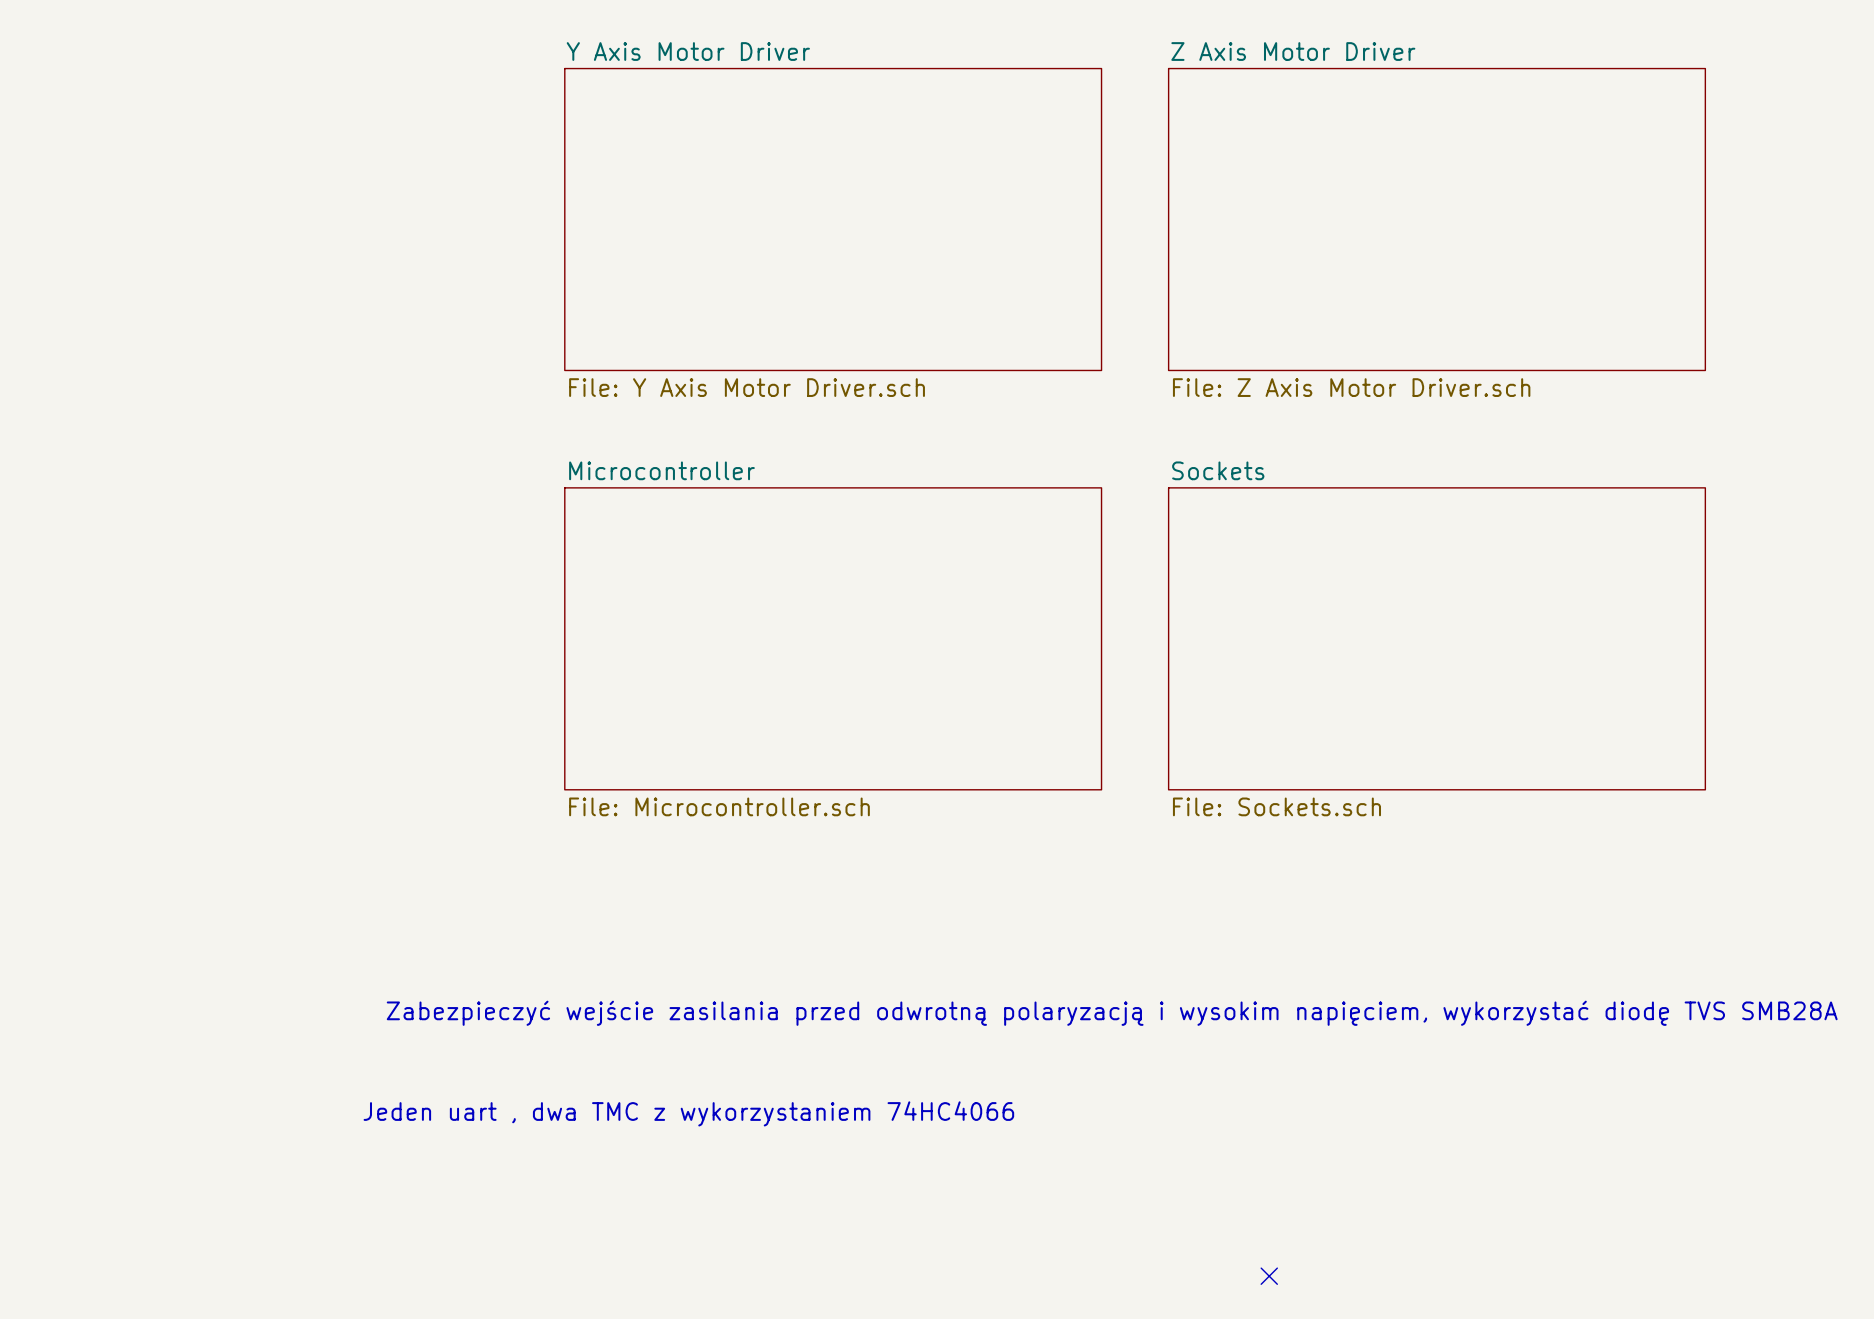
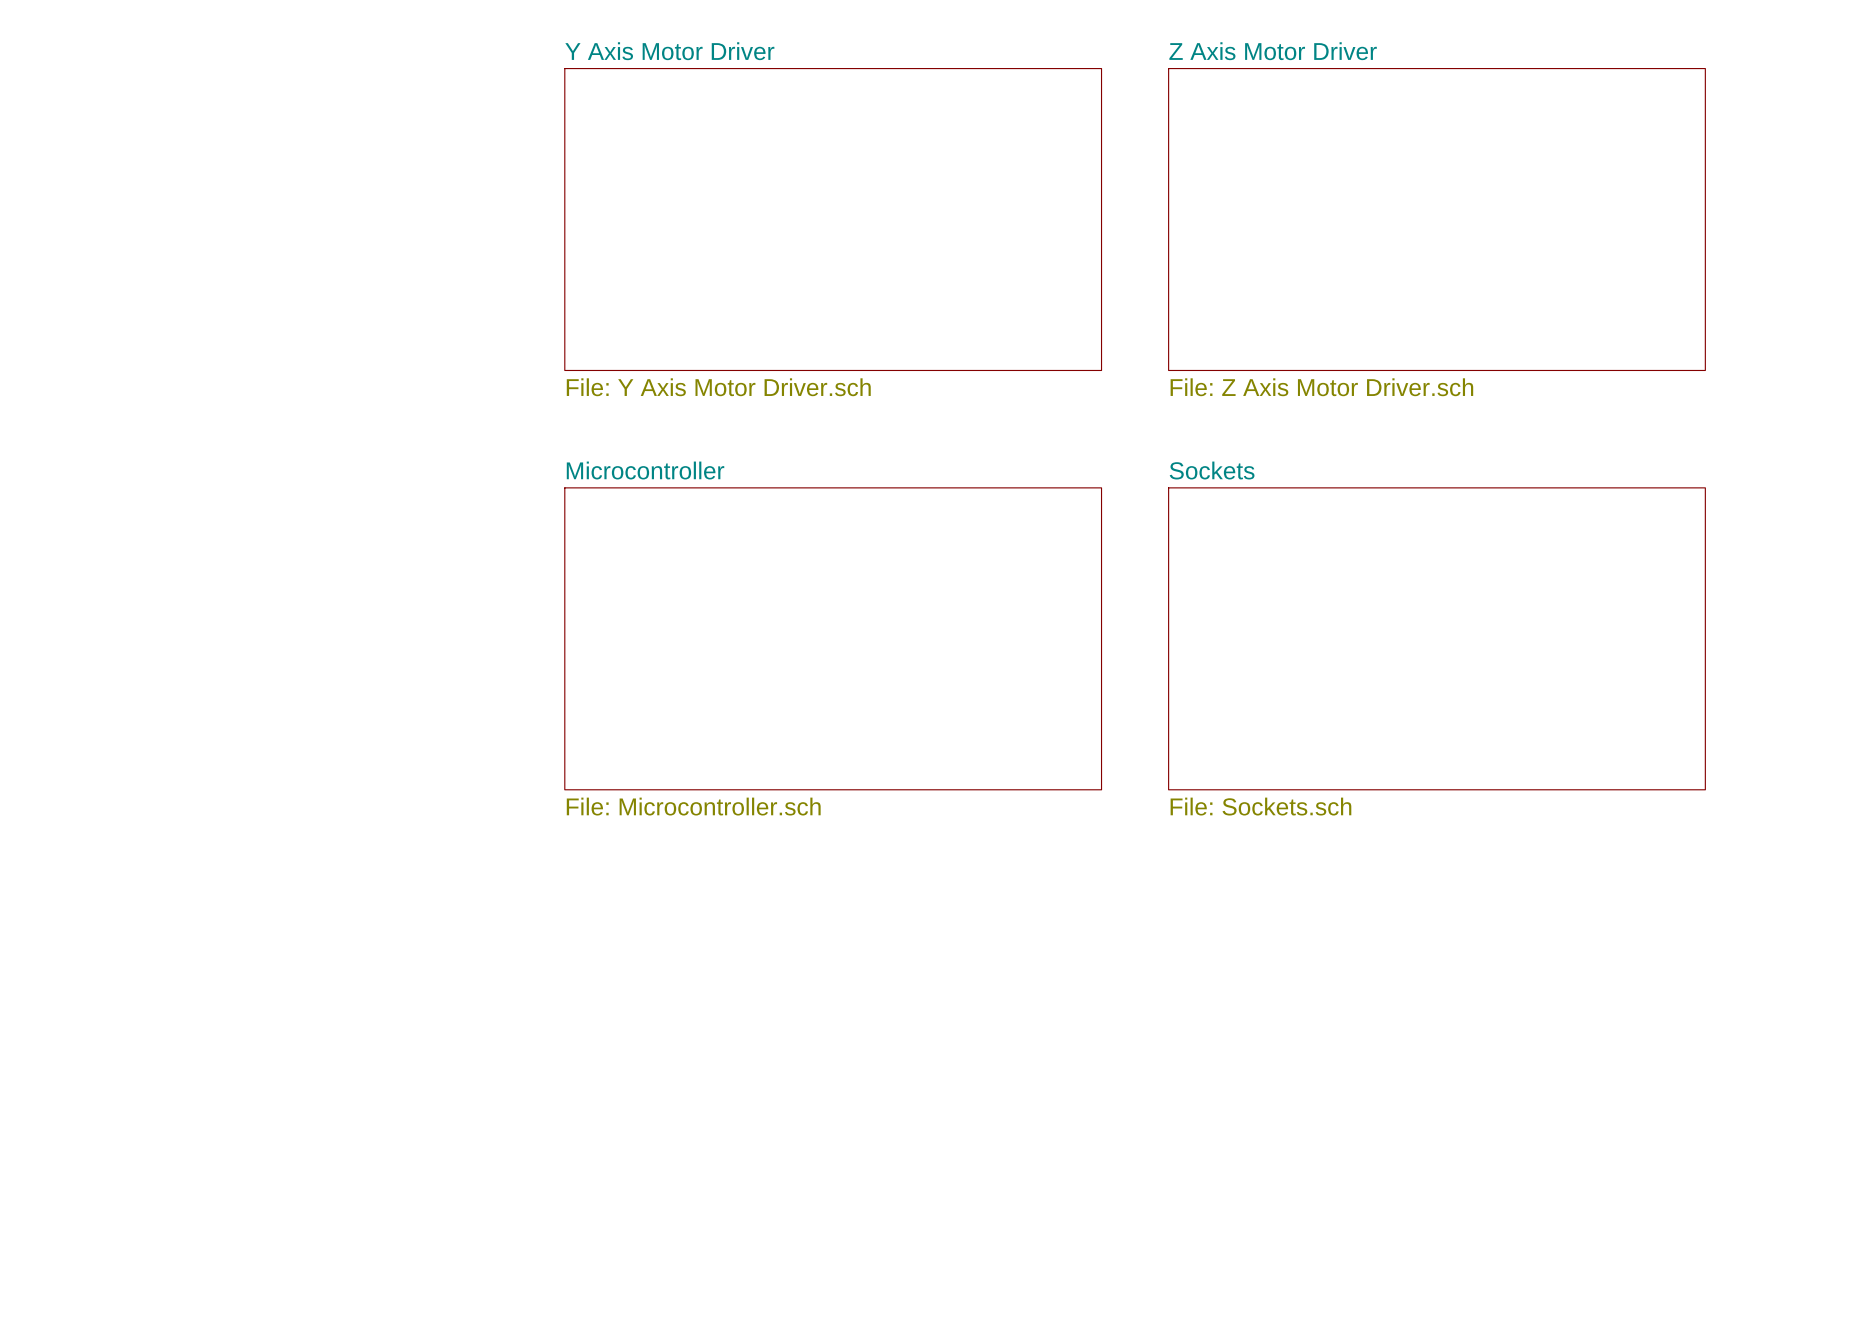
text: Zabezpieczyć wejście zasilania przed odwrotną polaryzacją i wysokim napięciem, wykorzystać diodę TVS SMB28A (1112, 1013) -> none
text: Jeden uart , dwa TMC z wykorzystaniem 74HC4066 (688, 1113) -> none
no-connect mark: (1269, 1276) -> none

